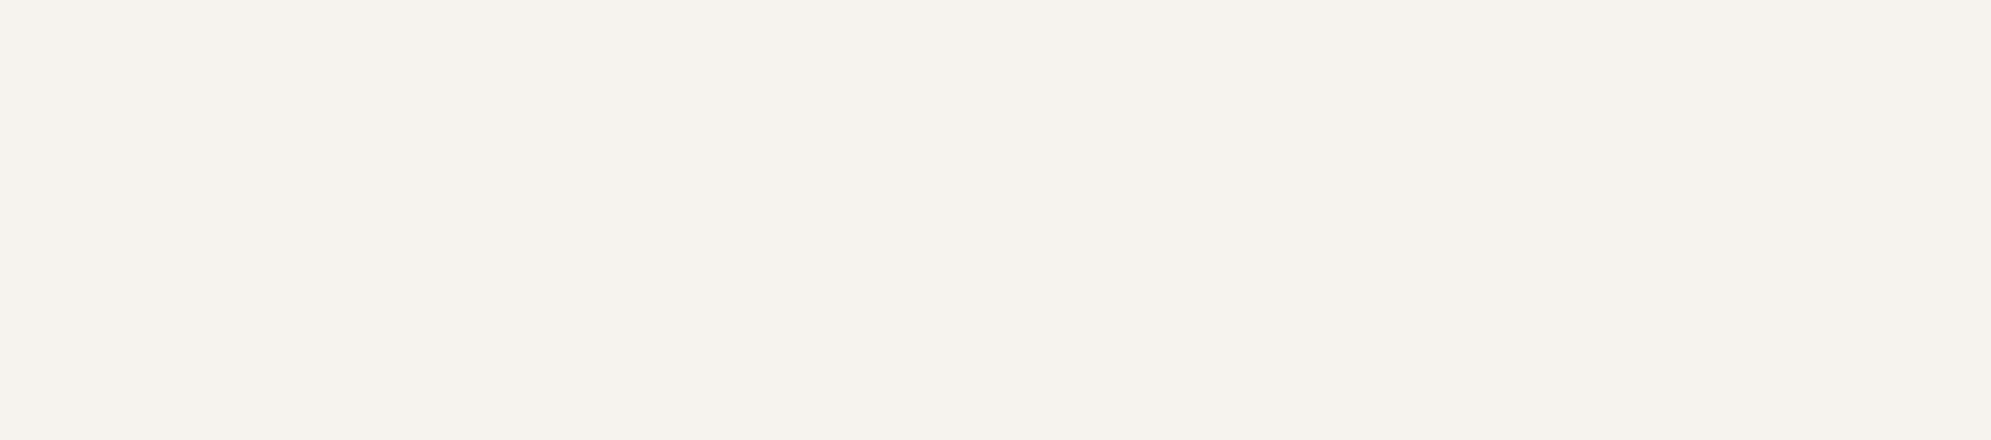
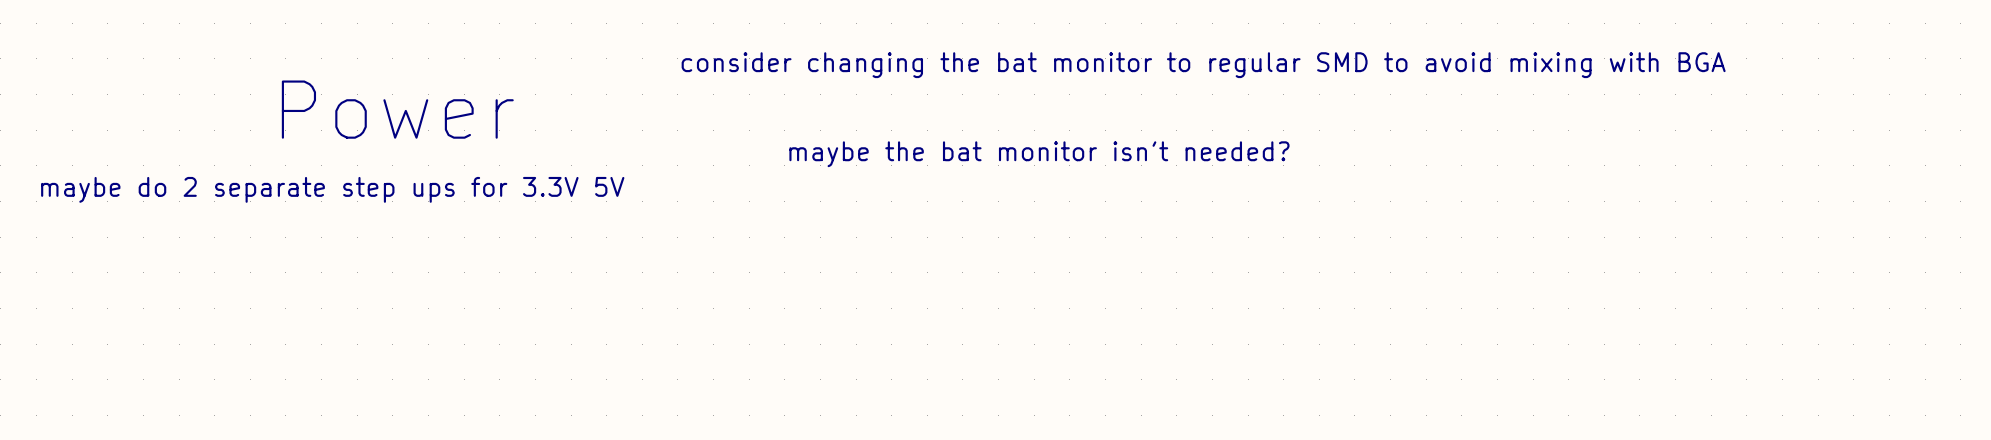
text: none -> consider changing the bat monitor to regular SMD to avoid mixing with BGA (1203, 65)
text: none -> Power (397, 109)
text: none -> maybe the bat monitor isn't needed? (1039, 154)
text: none -> maybe do 2 separate step ups for 3.3V 5V (332, 189)

